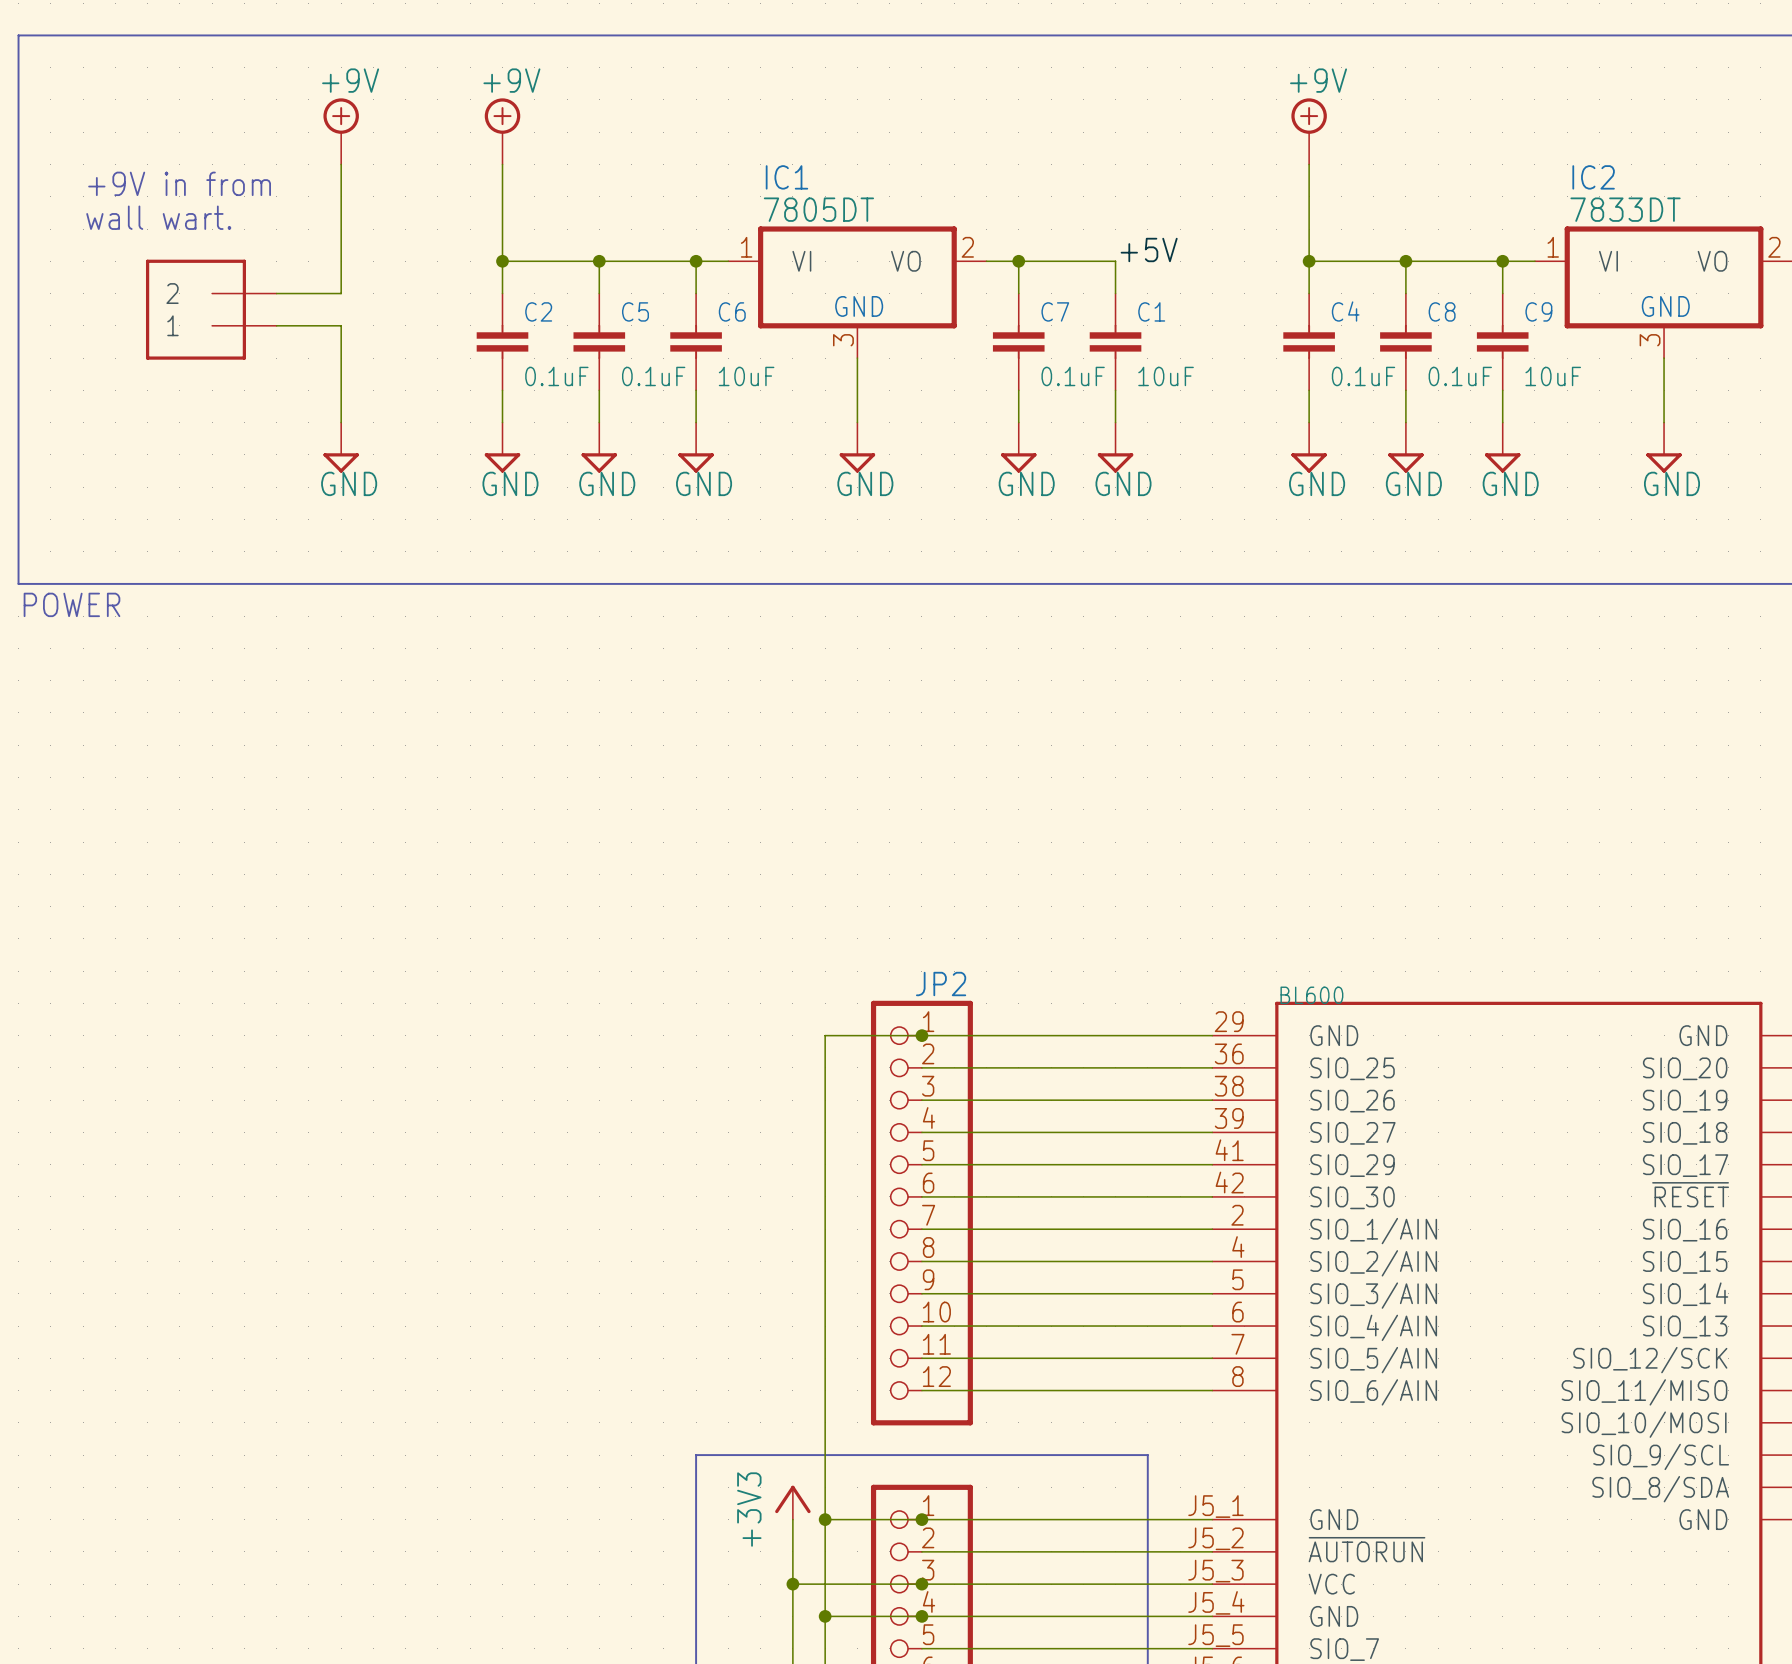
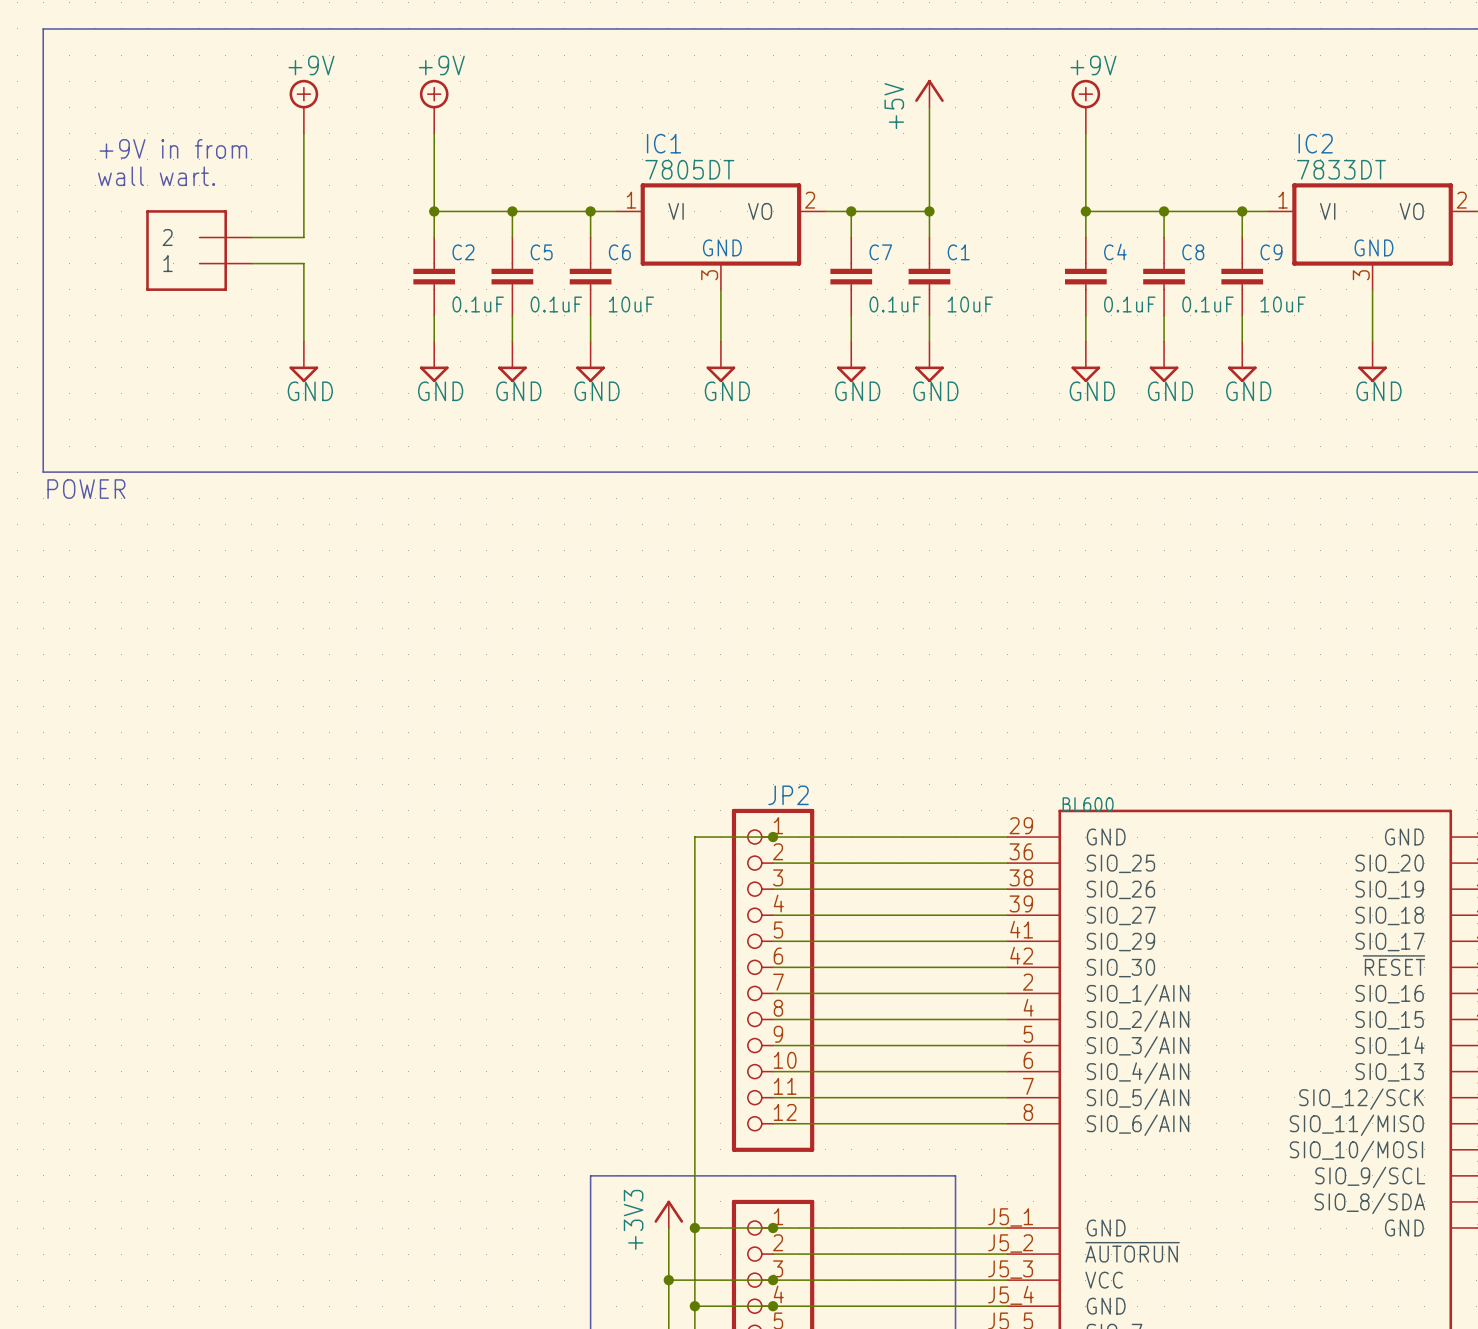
power symbol: none -> +5V (929, 93)
wire: none -> (929, 107) (929, 211)
label: +5V (1149, 249) -> none
junction: none -> (929, 211)

